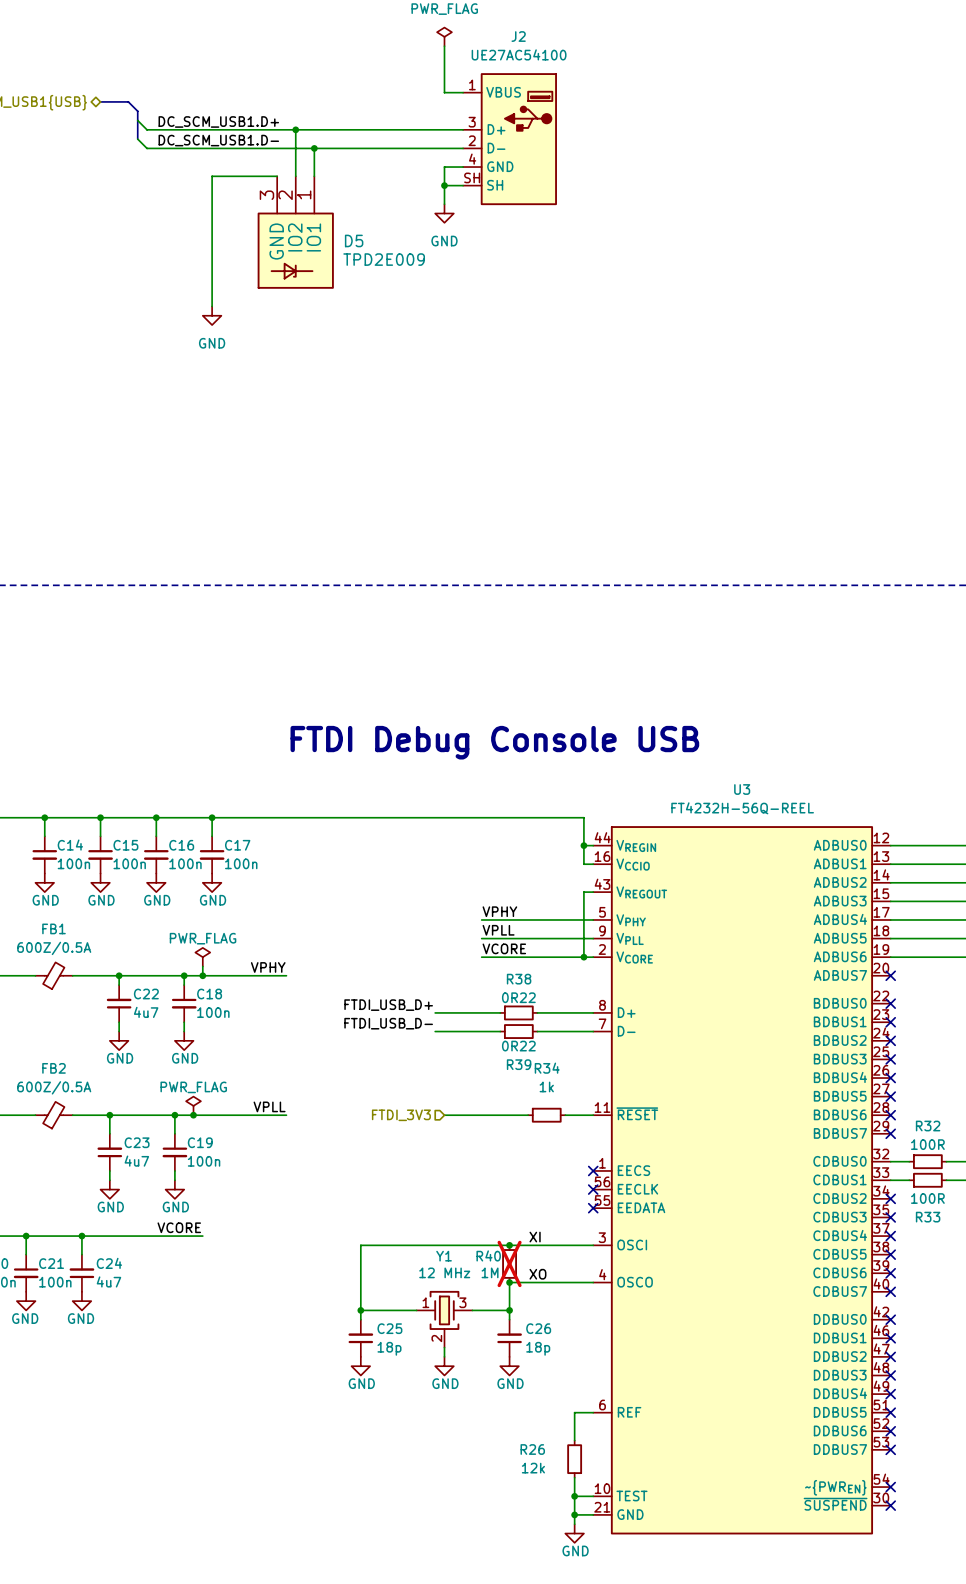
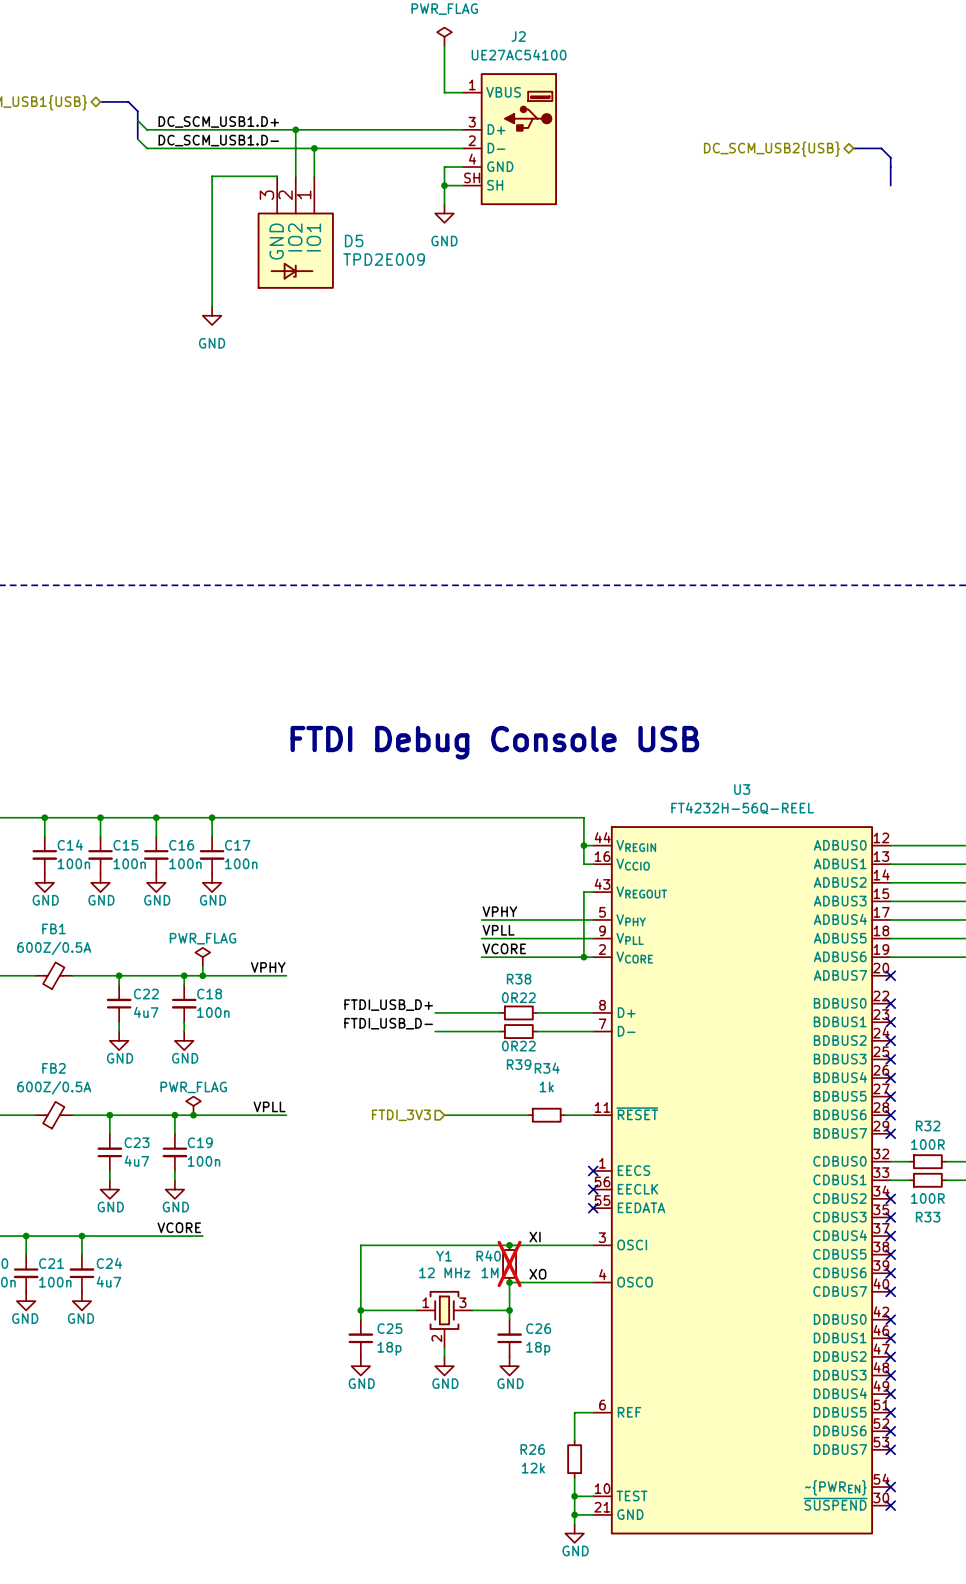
bus: none -> (853, 148) (881, 148) (890, 157) (890, 185)
hierarchical label: none -> DC_SCM_USB2{USB} (771, 149)

